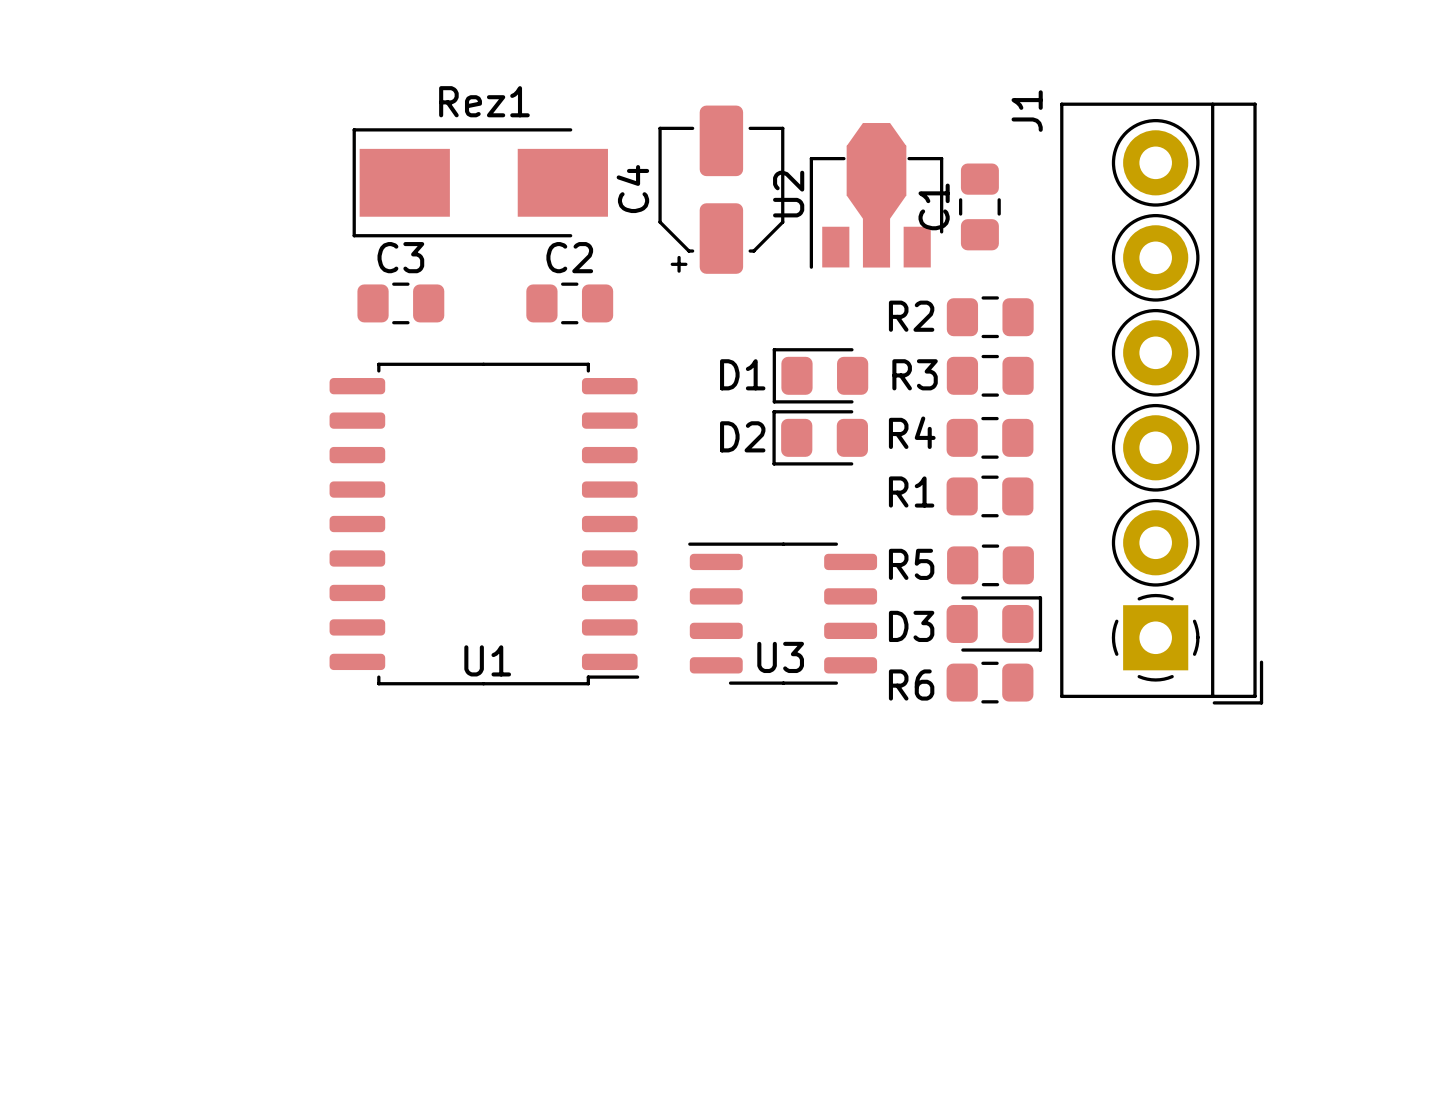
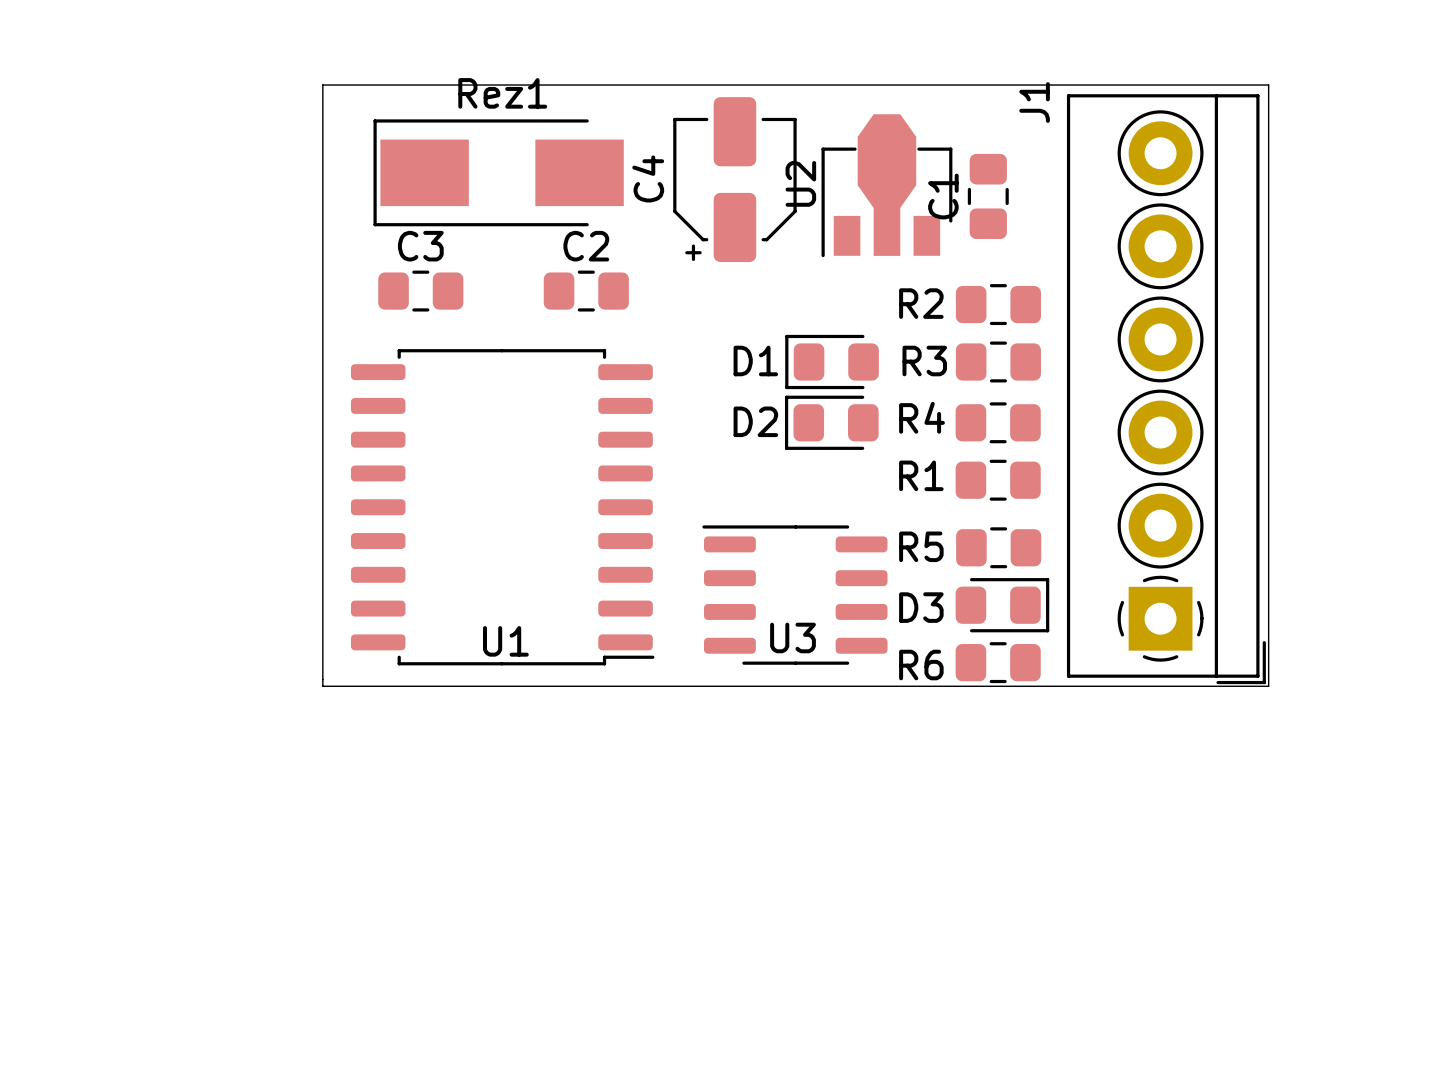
board edge: none -> (322, 85) (322, 686) (1268, 686) (1268, 85) (322, 85)

